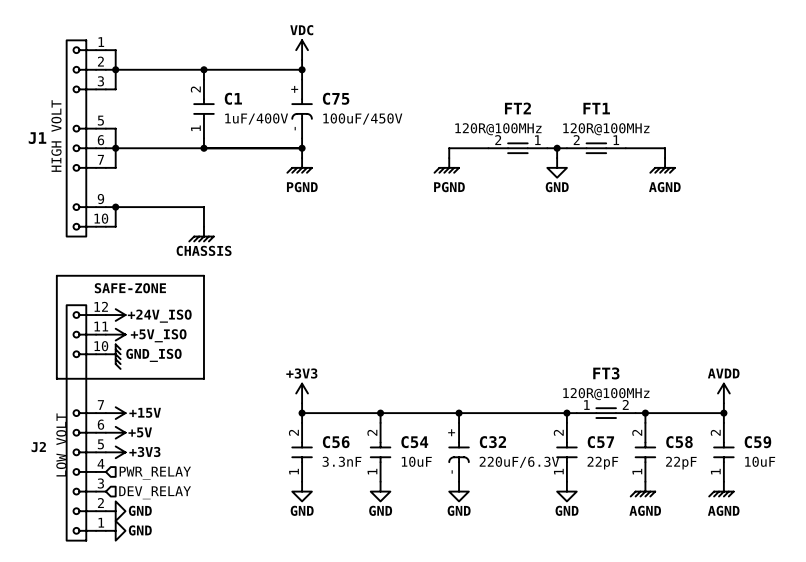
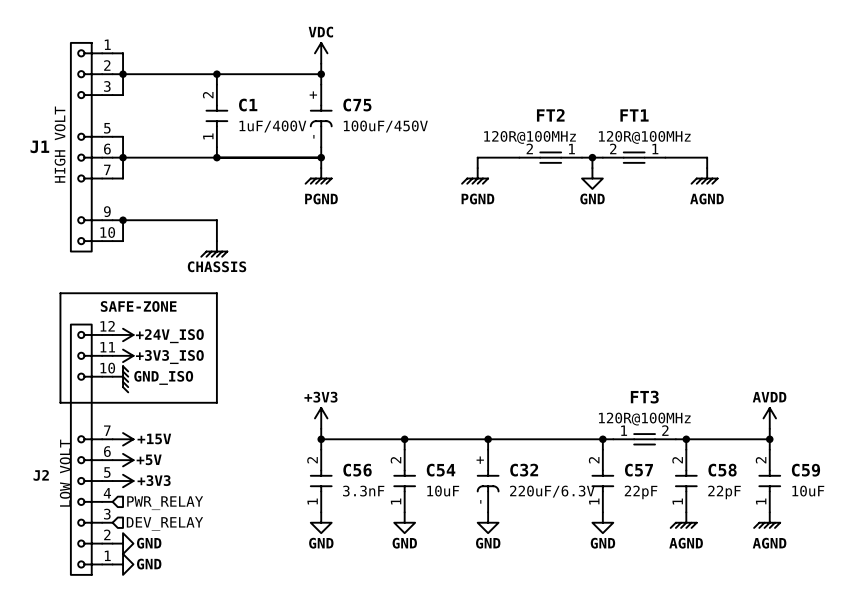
power symbol: +5V_ISO (115, 334) -> +3V3_ISO (123, 355)

